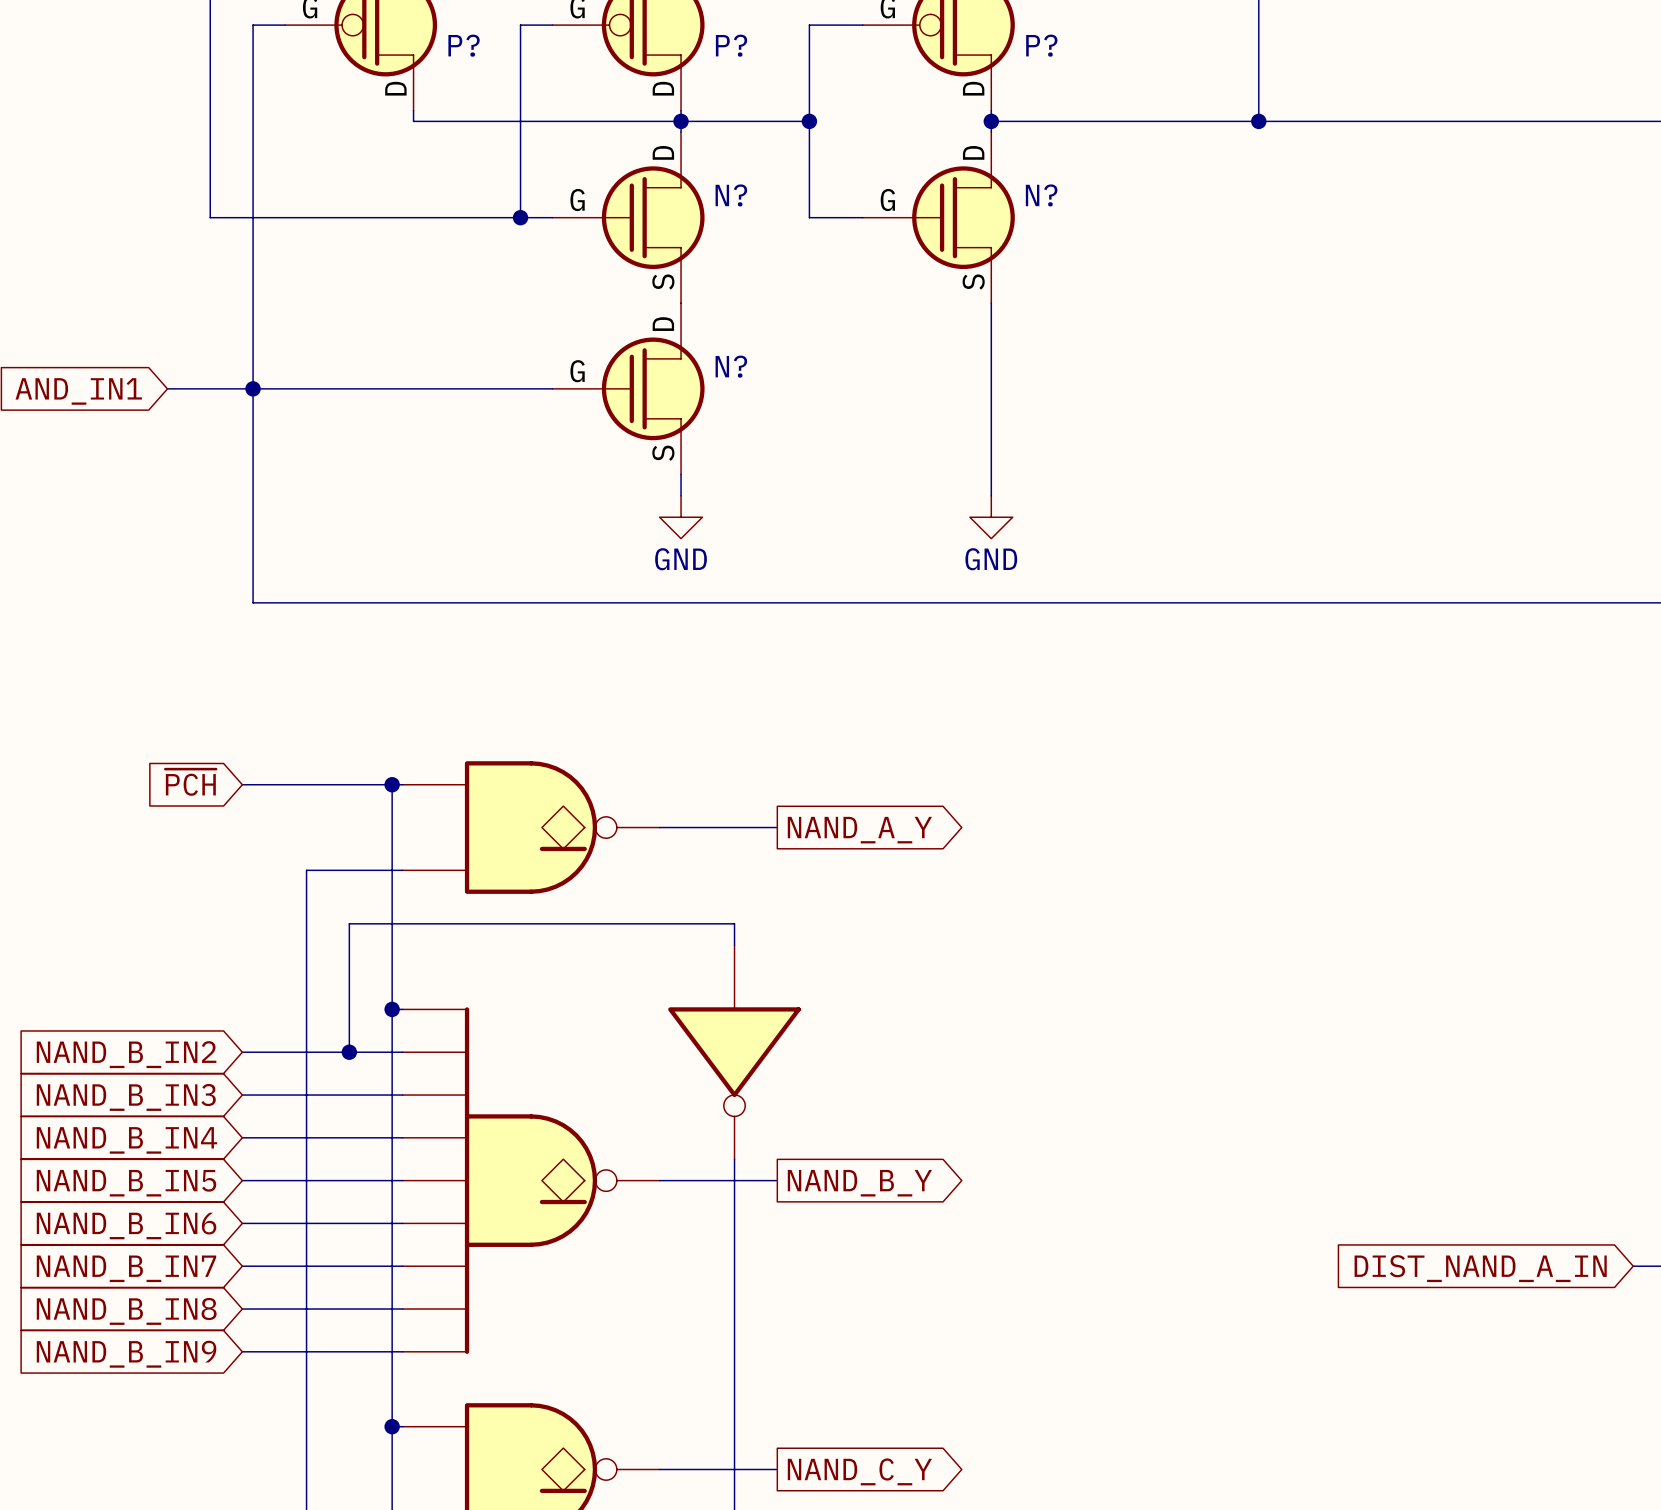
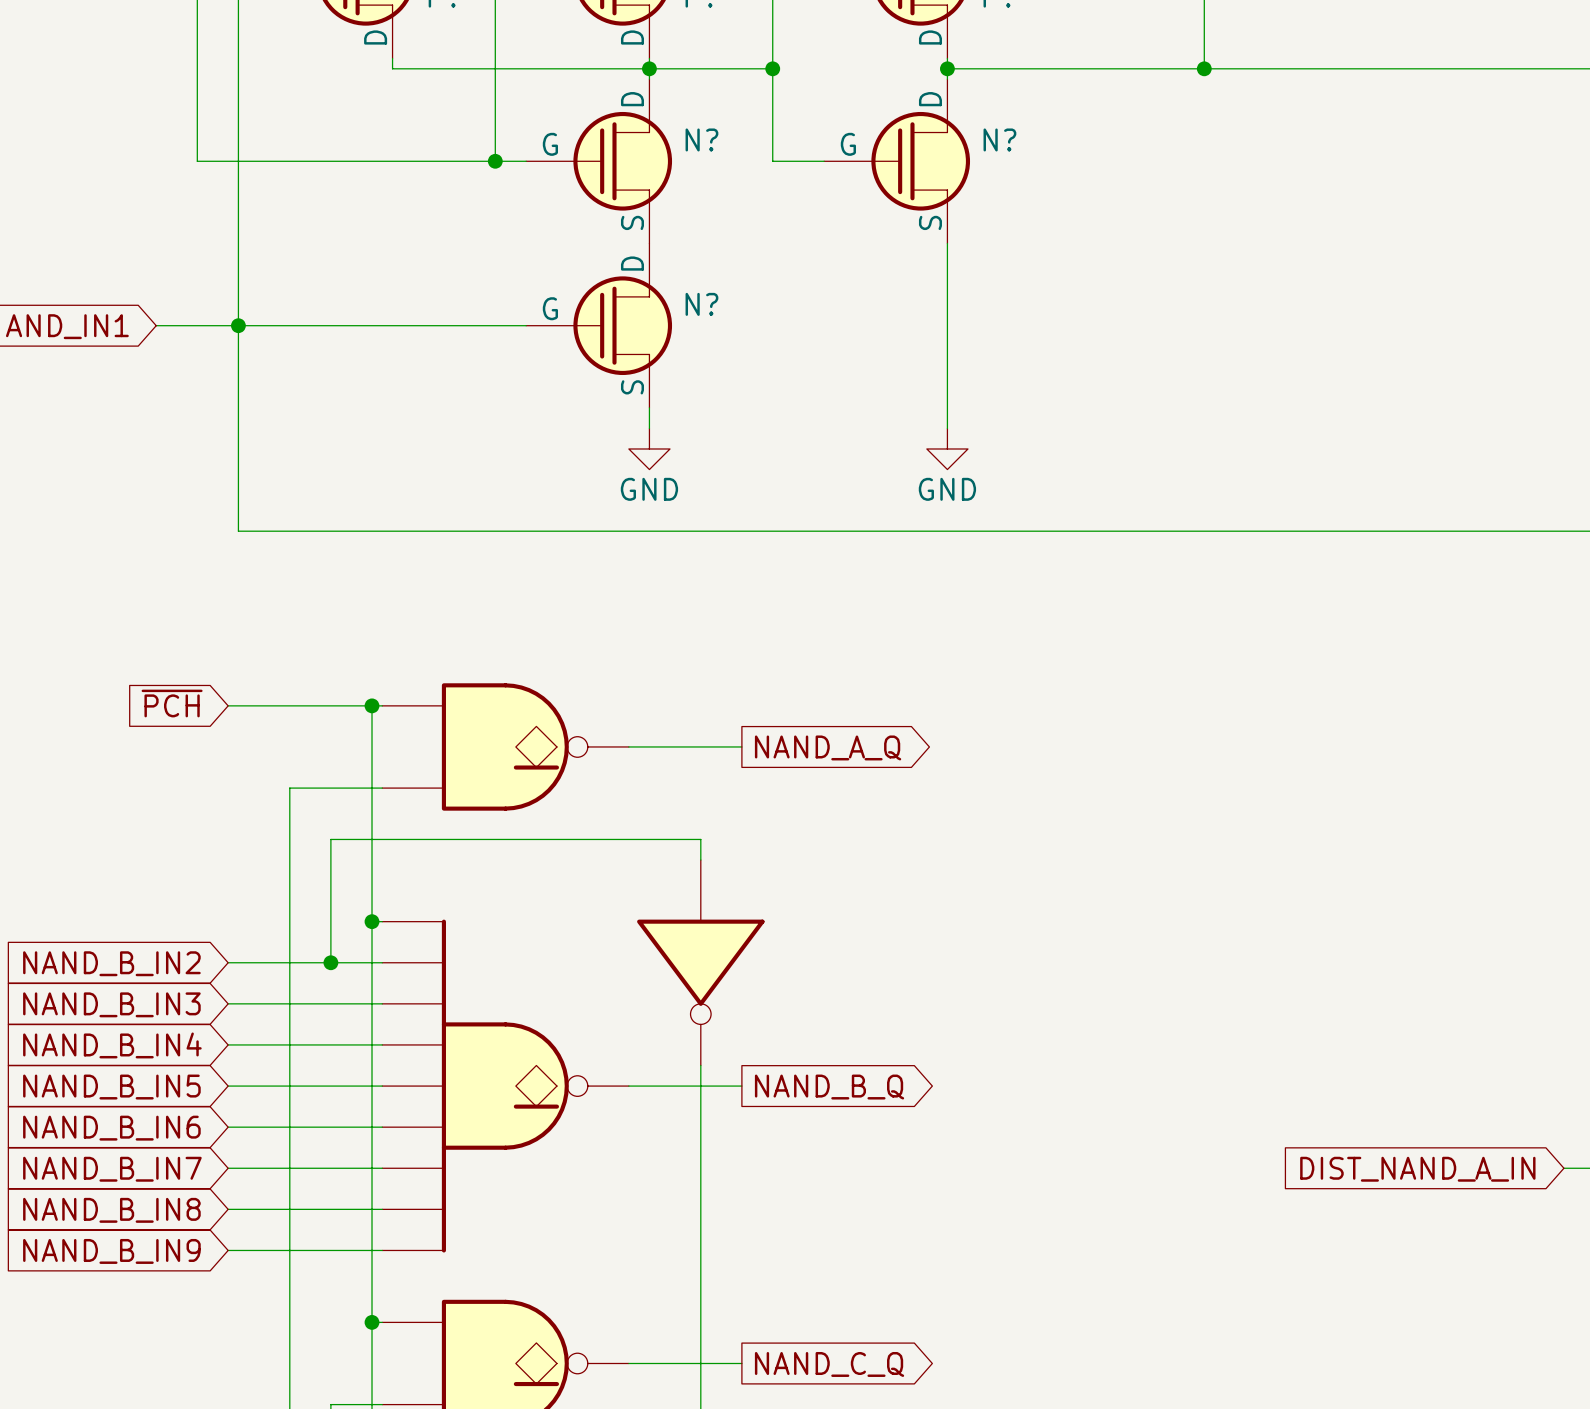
global label: NAND_A_Y (859, 830) -> NAND_A_Q (828, 747)
global label: NAND_B_Y (859, 1183) -> NAND_B_Q (829, 1087)
global label: NAND_C_Y (859, 1471) -> NAND_C_Q (829, 1364)

